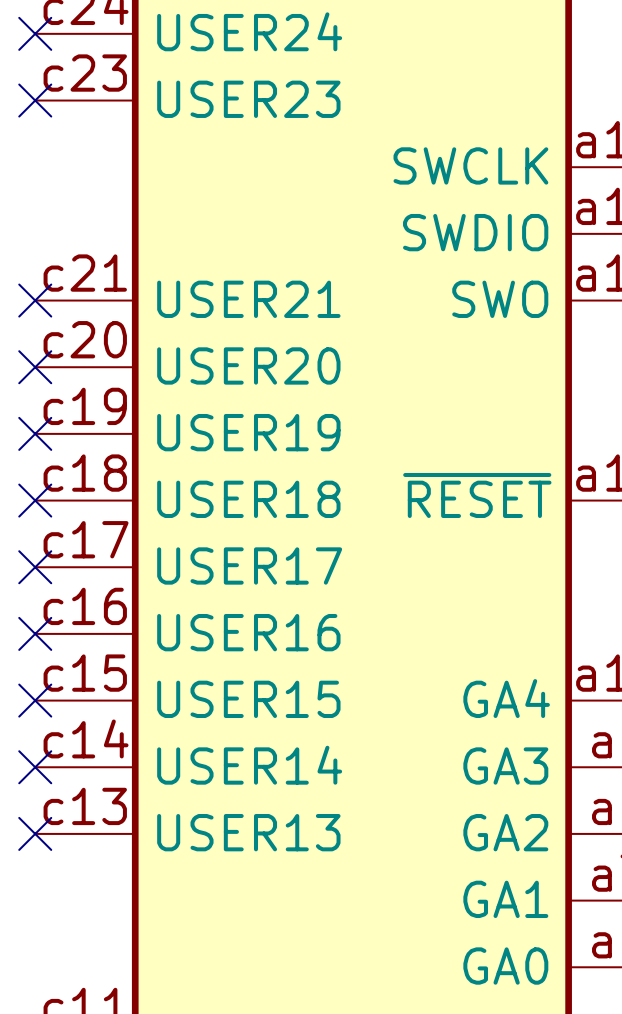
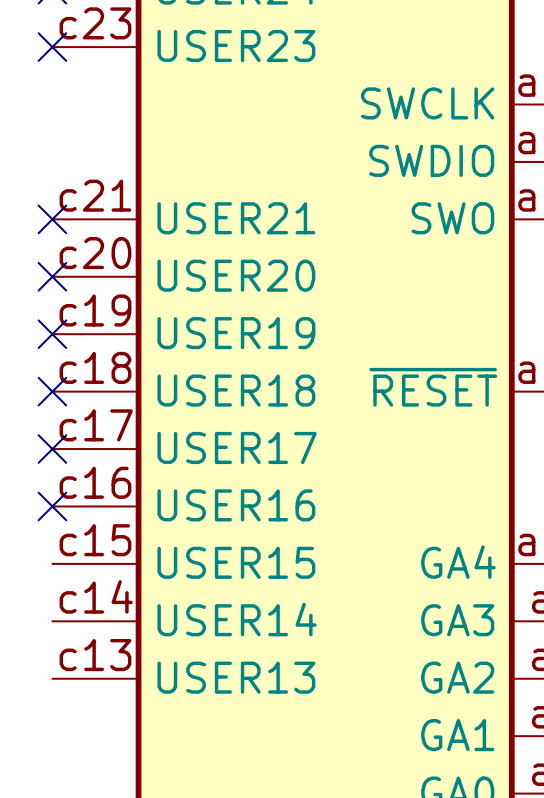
no-connect mark: (35, 700) -> none
no-connect mark: (35, 767) -> none
no-connect mark: (35, 833) -> none

